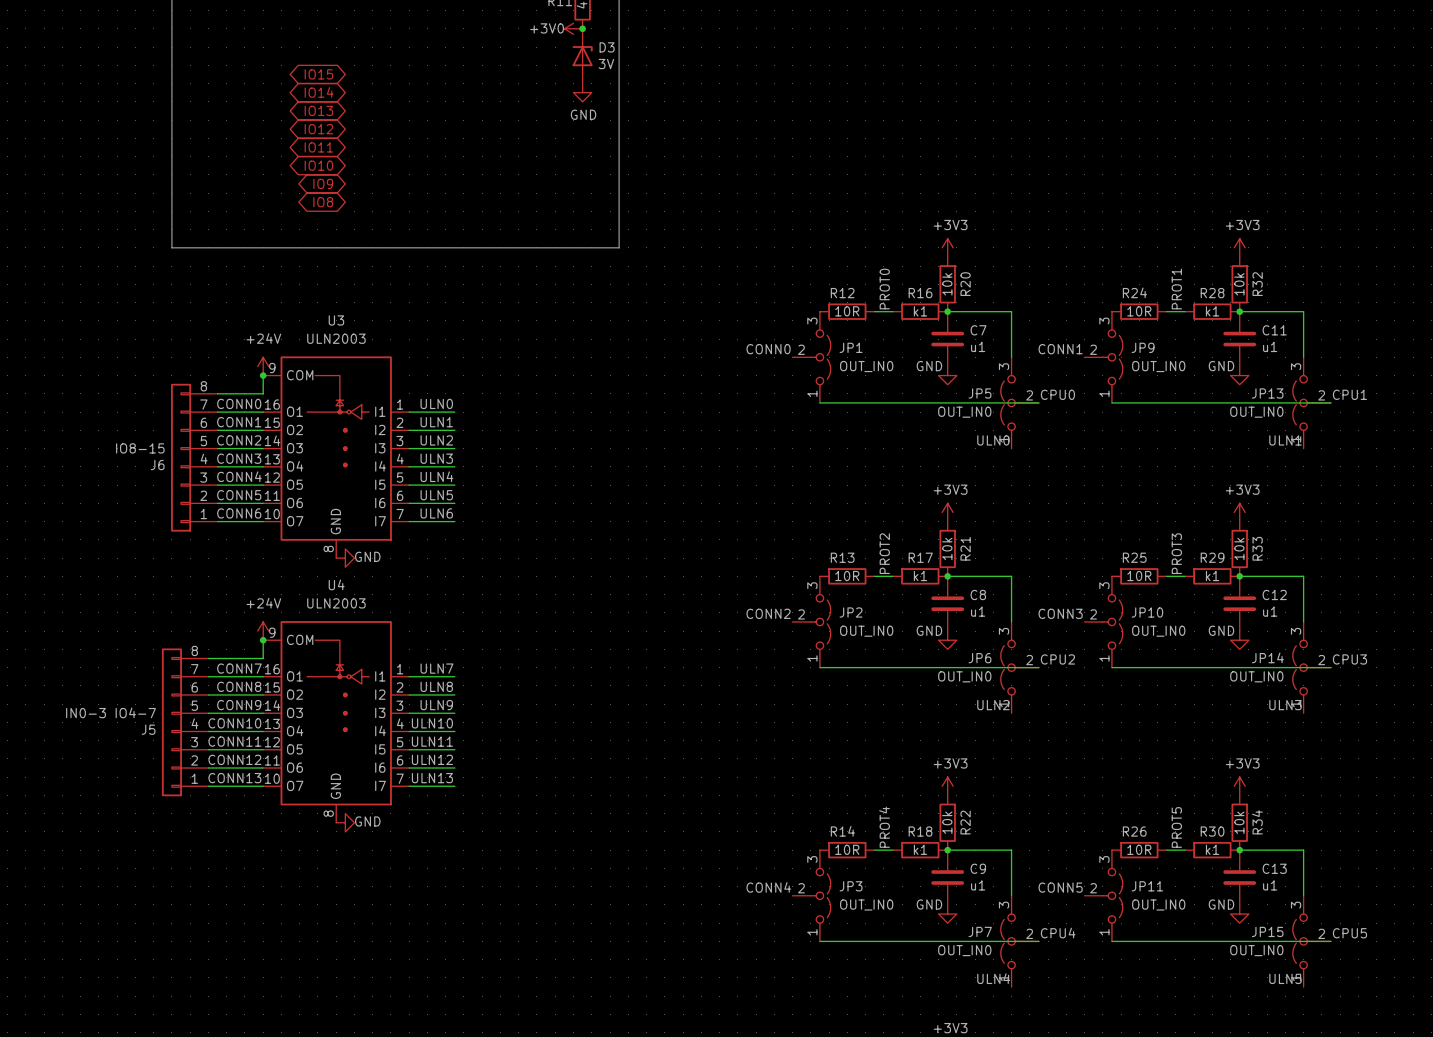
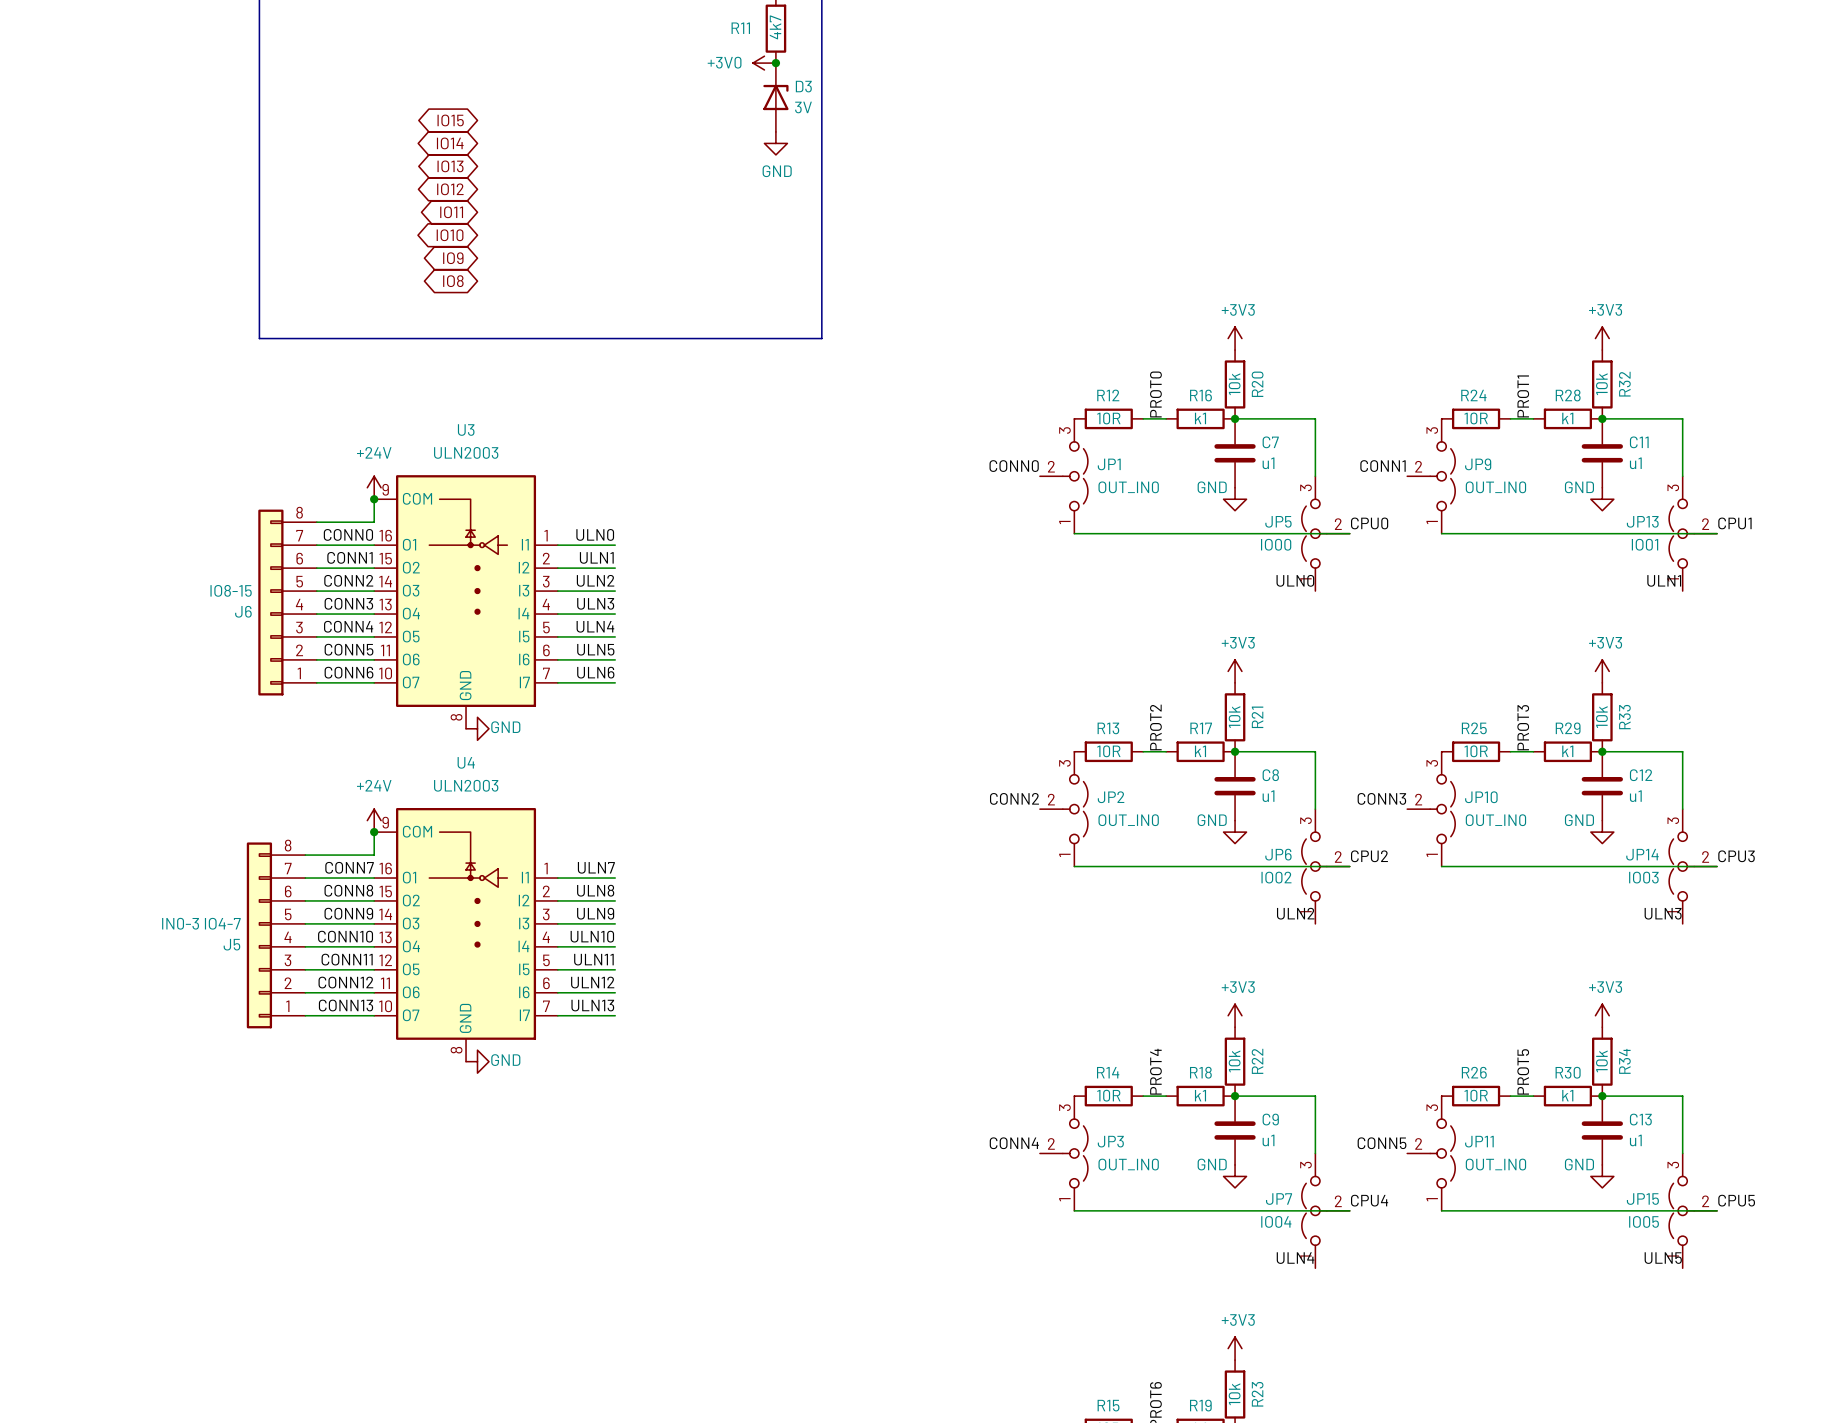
JP5 value: OUT_IN0 (964, 412) -> IO00 (1276, 544)
JP13 value: OUT_IN0 (1256, 412) -> IO01 (1645, 544)
JP6 value: OUT_IN0 (964, 676) -> IO02 (1276, 877)
JP14 value: OUT_IN0 (1256, 676) -> IO03 (1643, 877)
JP7 value: OUT_IN0 (964, 950) -> IO04 (1276, 1221)
JP15 value: OUT_IN0 (1256, 950) -> IO05 (1644, 1221)

